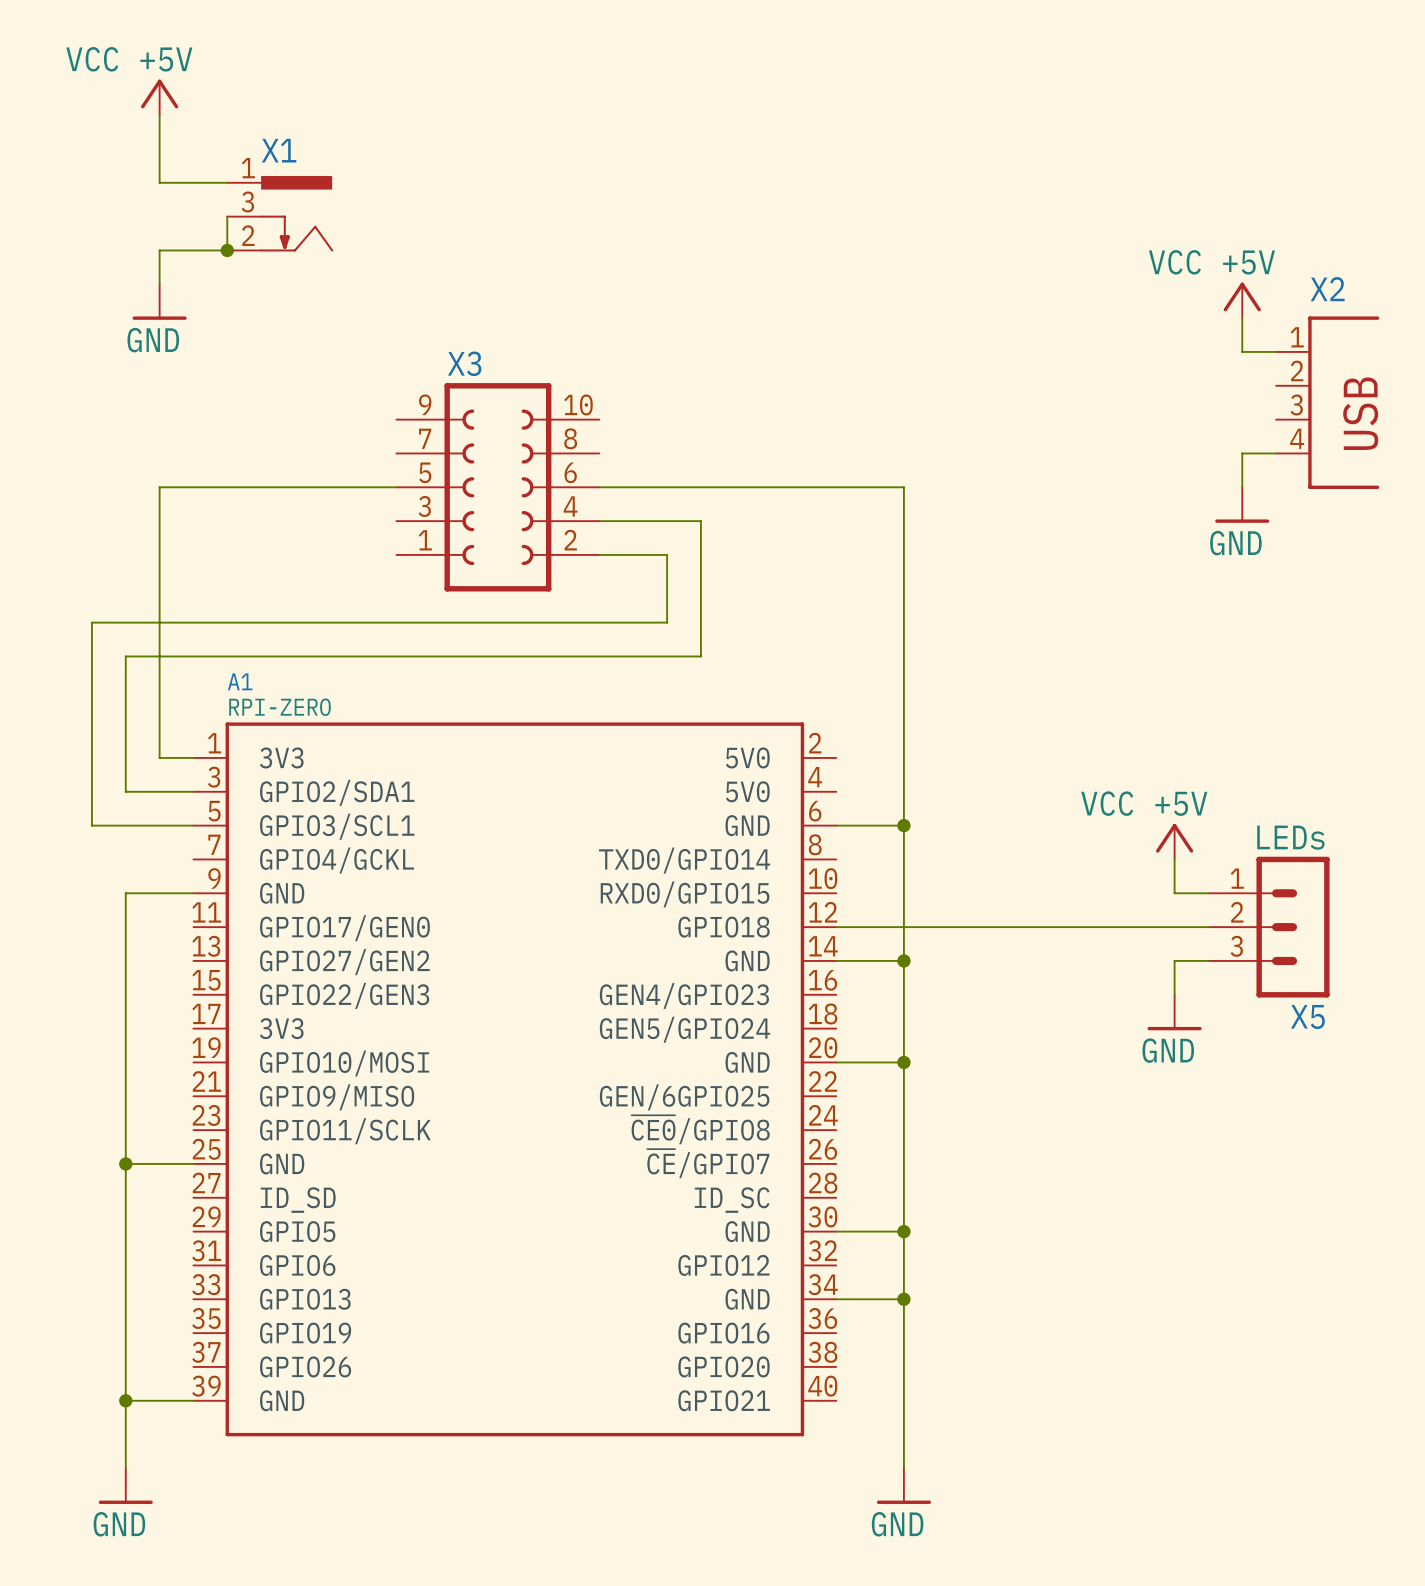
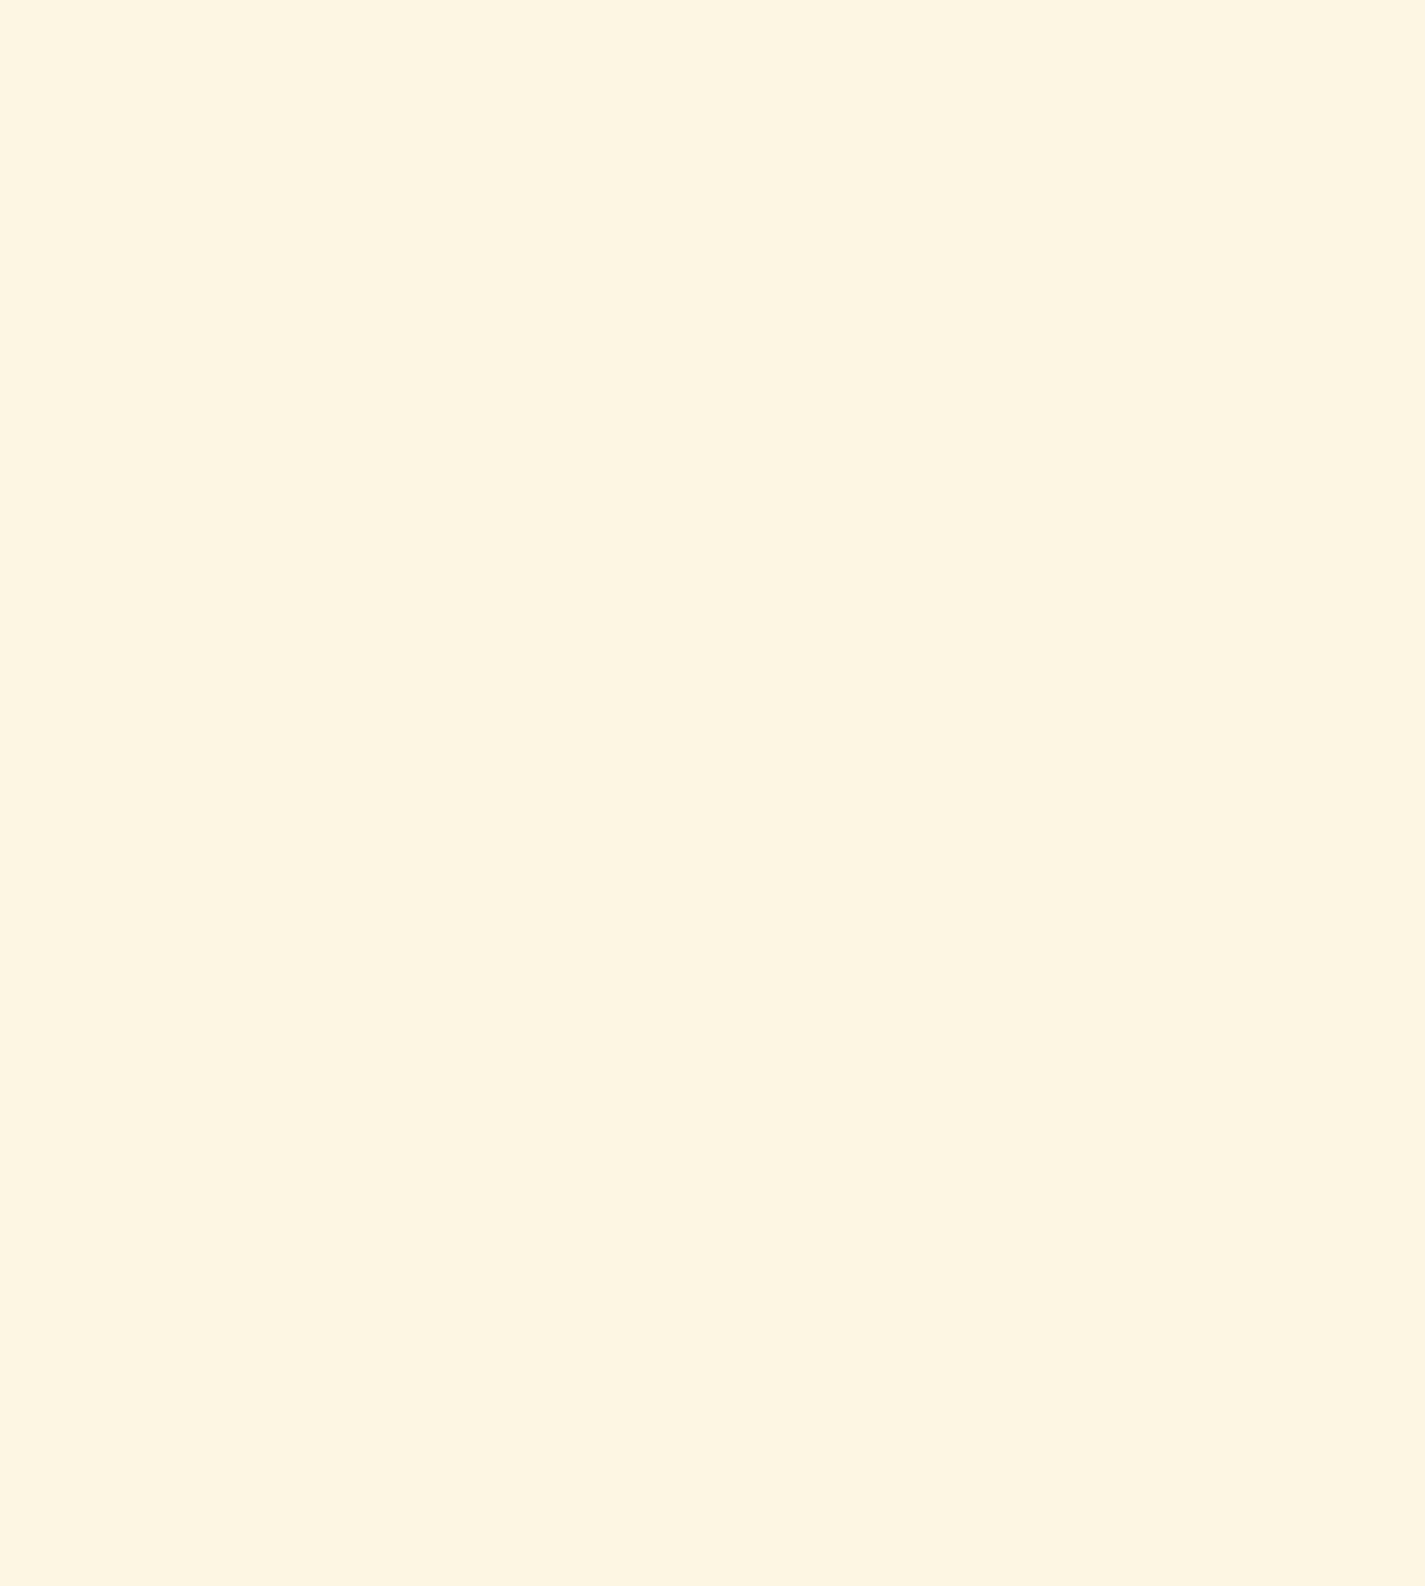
power symbol: VCC +5V (159, 97) -> none
wire: (159, 115) (159, 182) (227, 182) -> none
X1: (280, 213) -> none
wire: (227, 216) (227, 250) (159, 250) (159, 284) -> none
junction: (227, 250) -> none
power symbol: VCC +5V (1242, 300) -> none
power symbol: GND (159, 302) -> none
wire: (1242, 318) (1242, 351) (1276, 351) -> none
X2: (1327, 402) -> none
wire: (1276, 453) (1242, 453) (1242, 487) -> none
wire: (396, 487) (159, 487) (159, 757) (193, 757) -> none
X3: (497, 487) -> none
wire: (599, 487) (903, 487) (903, 1468) -> none
power symbol: GND (1242, 505) -> none
wire: (599, 521) (700, 521) (700, 656) (125, 656) (125, 791) (193, 791) -> none
wire: (599, 554) (667, 554) (667, 622) (91, 622) (91, 825) (193, 825) -> none
wire: (836, 825) (903, 825) -> none
junction: (903, 825) -> none
power symbol: VCC +5V (1174, 841) -> none
wire: (1174, 859) (1174, 893) (1208, 893) -> none
wire: (193, 893) (125, 893) (125, 1468) -> none
wire: (836, 927) (1208, 927) -> none
X5: LEDs (1268, 927) -> none
wire: (836, 960) (903, 960) -> none
junction: (903, 960) -> none
wire: (1208, 960) (1174, 960) (1174, 994) -> none
power symbol: GND (1174, 1012) -> none
wire: (836, 1062) (903, 1062) -> none
junction: (903, 1062) -> none
A1: RPI-ZERO (514, 1079) -> none
wire: (125, 1163) (193, 1163) -> none
junction: (125, 1163) -> none
wire: (836, 1231) (903, 1231) -> none
junction: (903, 1231) -> none
wire: (836, 1299) (903, 1299) -> none
junction: (903, 1299) -> none
wire: (125, 1400) (193, 1400) -> none
junction: (125, 1400) -> none
power symbol: GND (125, 1486) -> none
power symbol: GND (903, 1486) -> none

